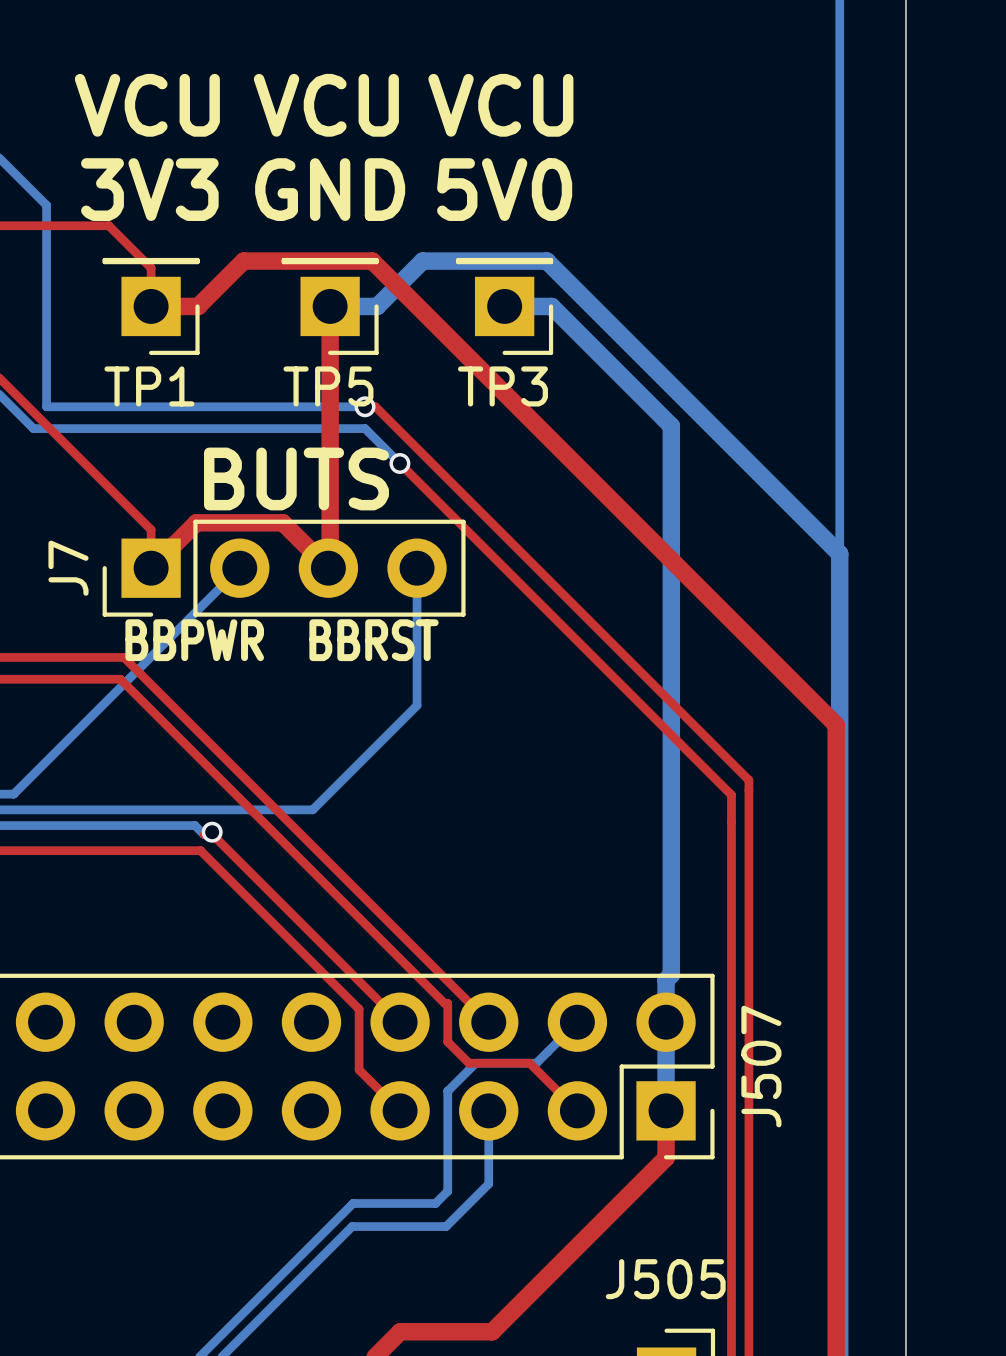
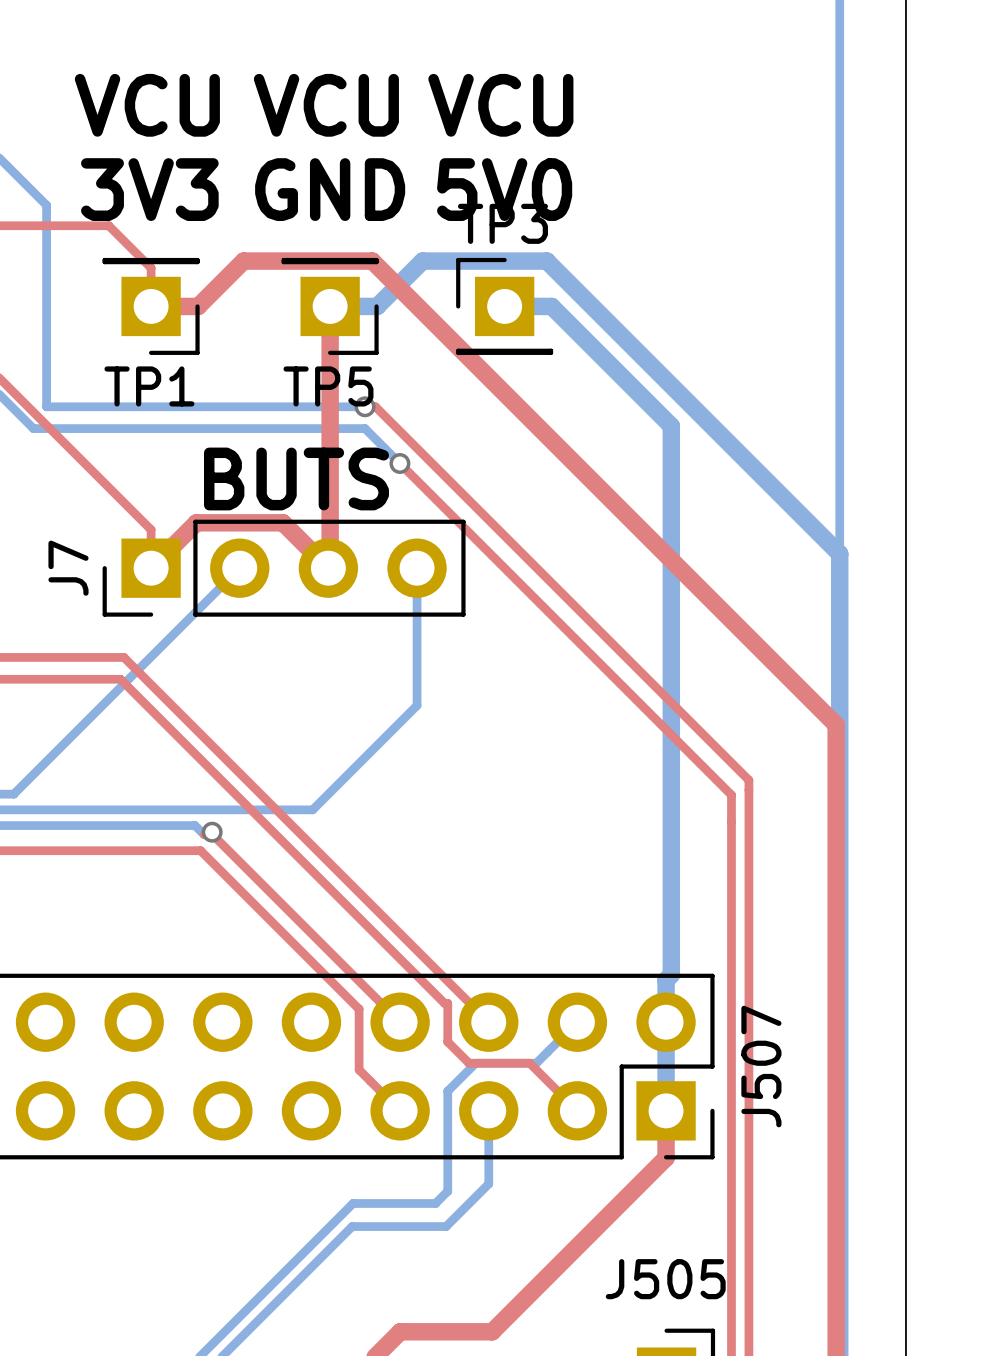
TP3 rotation: 0° (504, 306) -> 180° (504, 306)
text: BBPWR (194, 640) -> none
text: BBRST (374, 640) -> none

